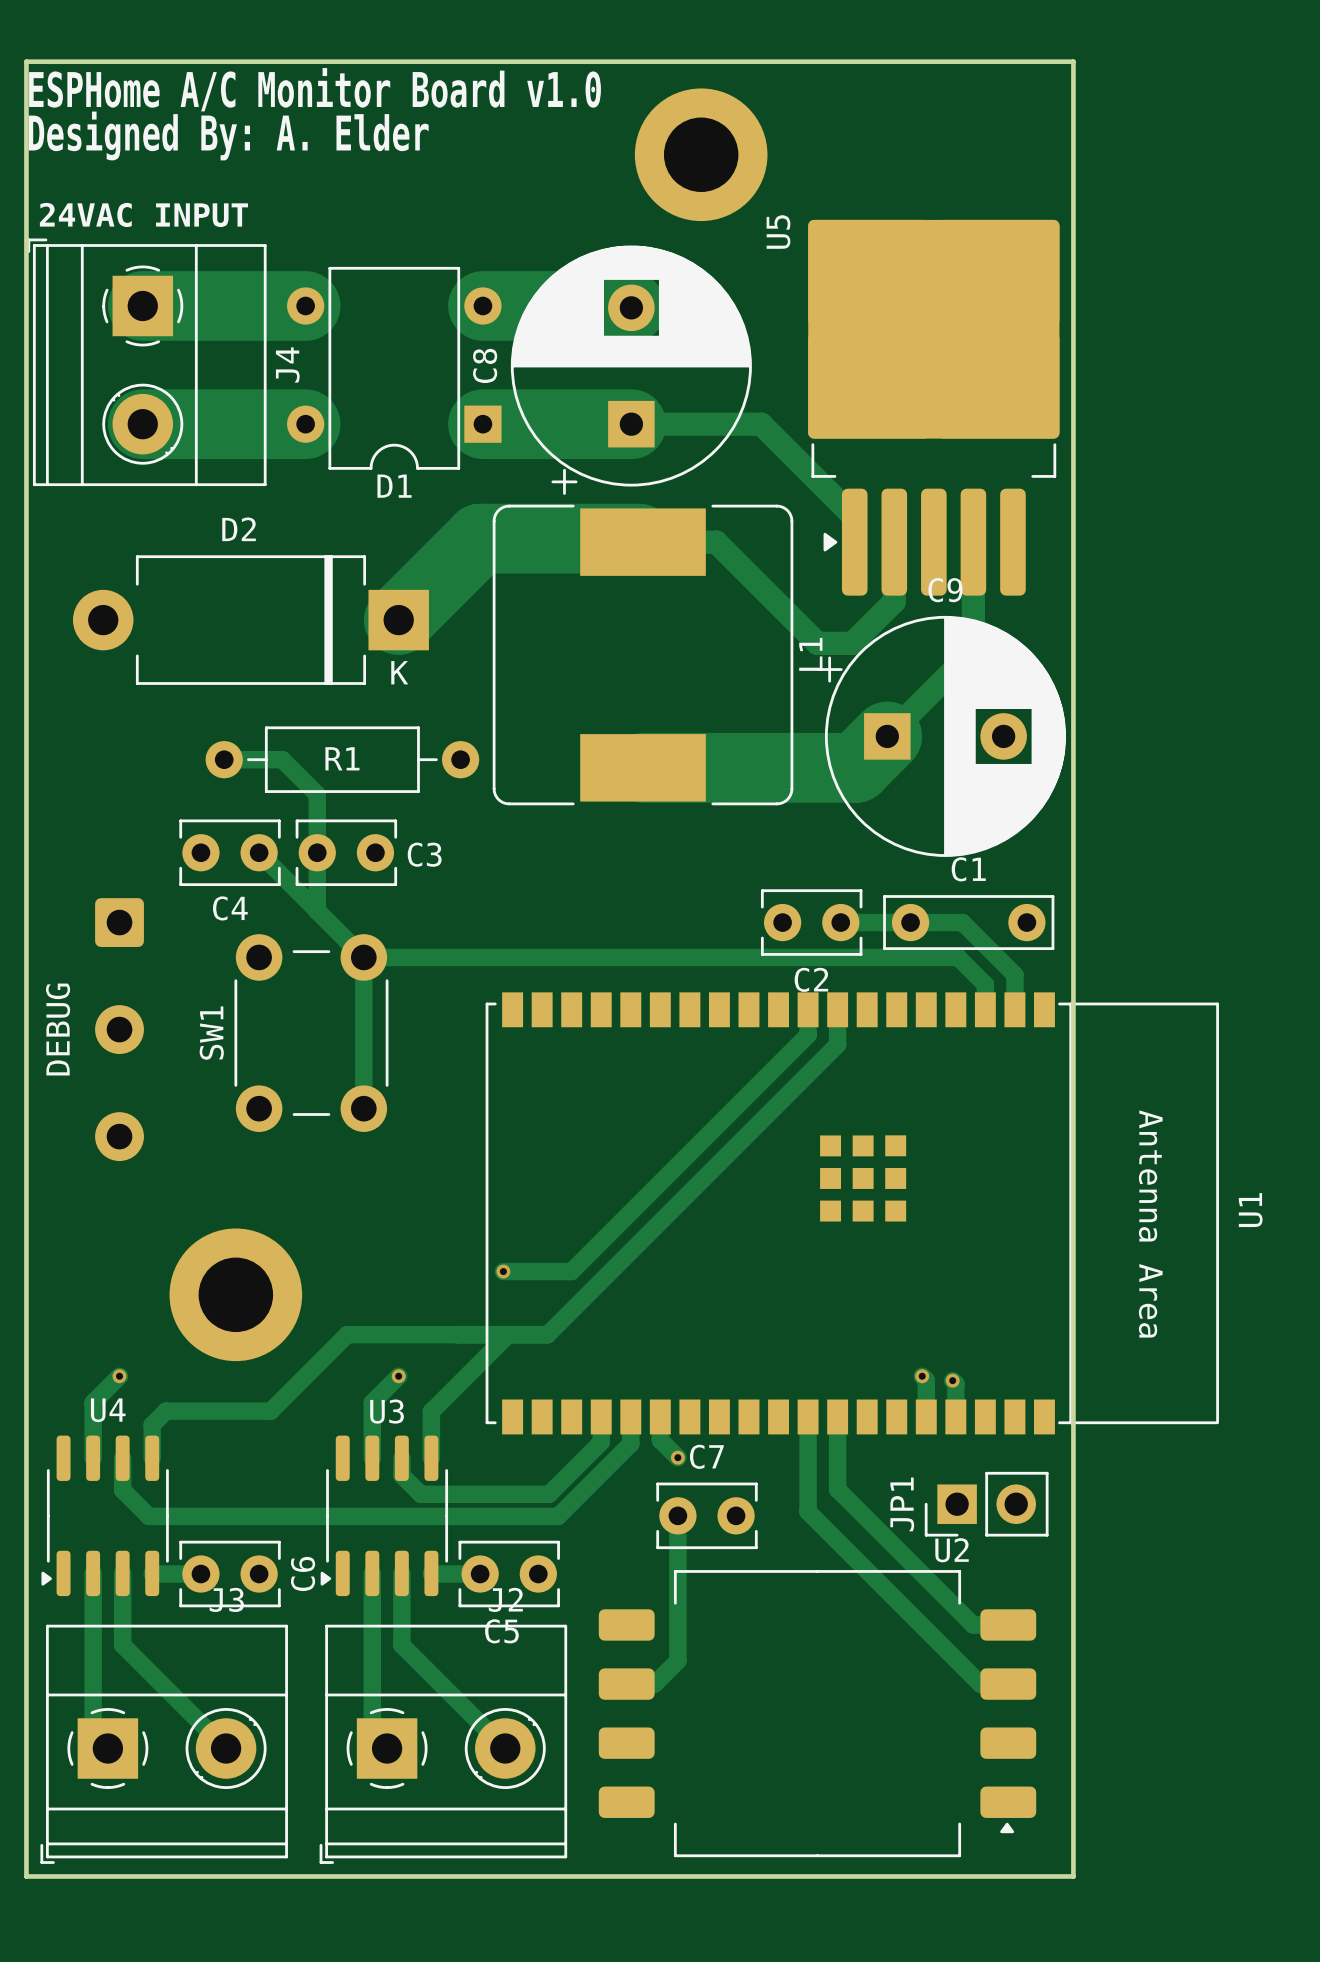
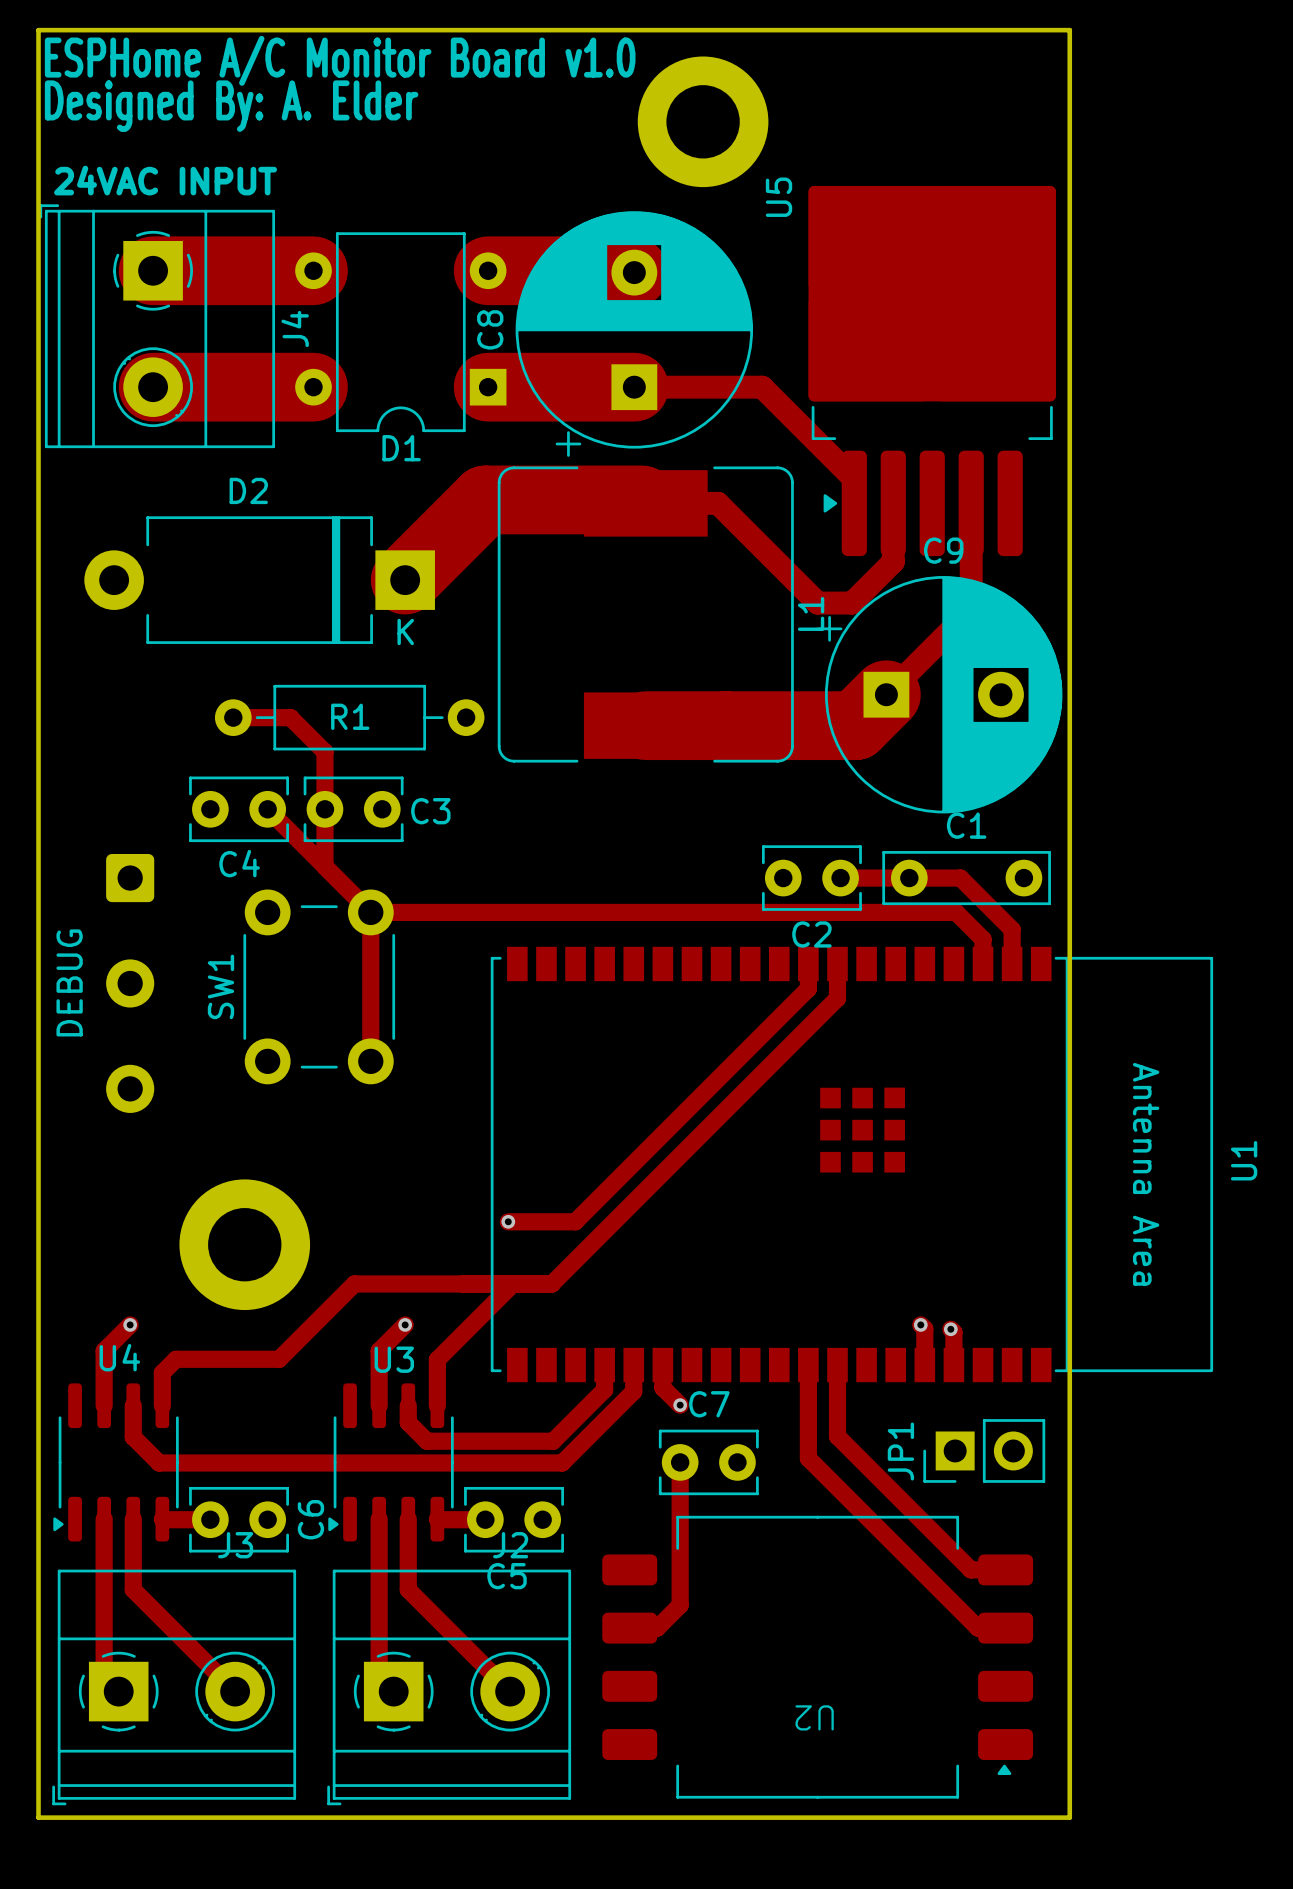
U2 name rotation: 0° (952, 1550) -> 180° (814, 1717)
U2 name position: U2 (952, 1550) -> U2 (814, 1717)

